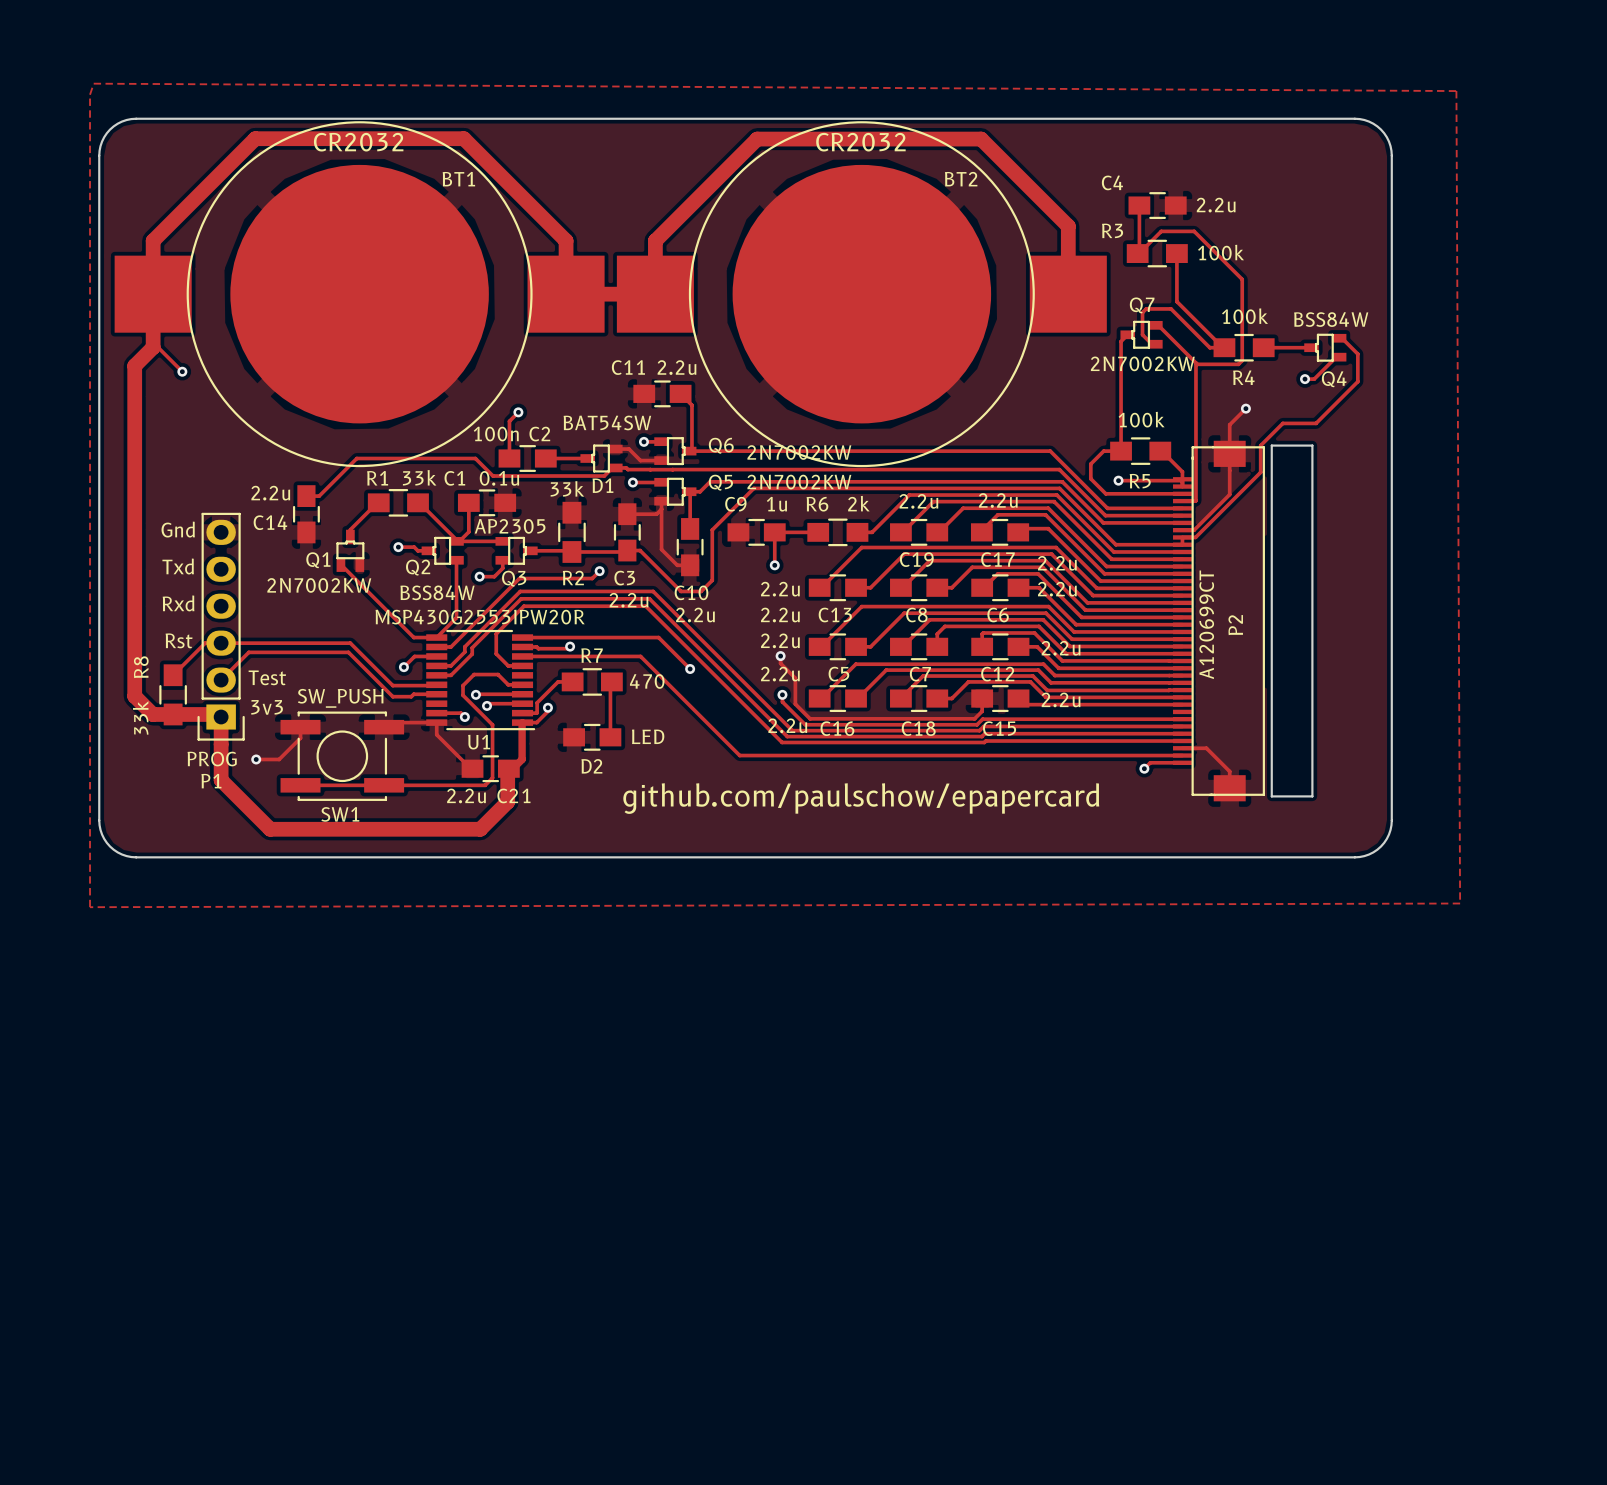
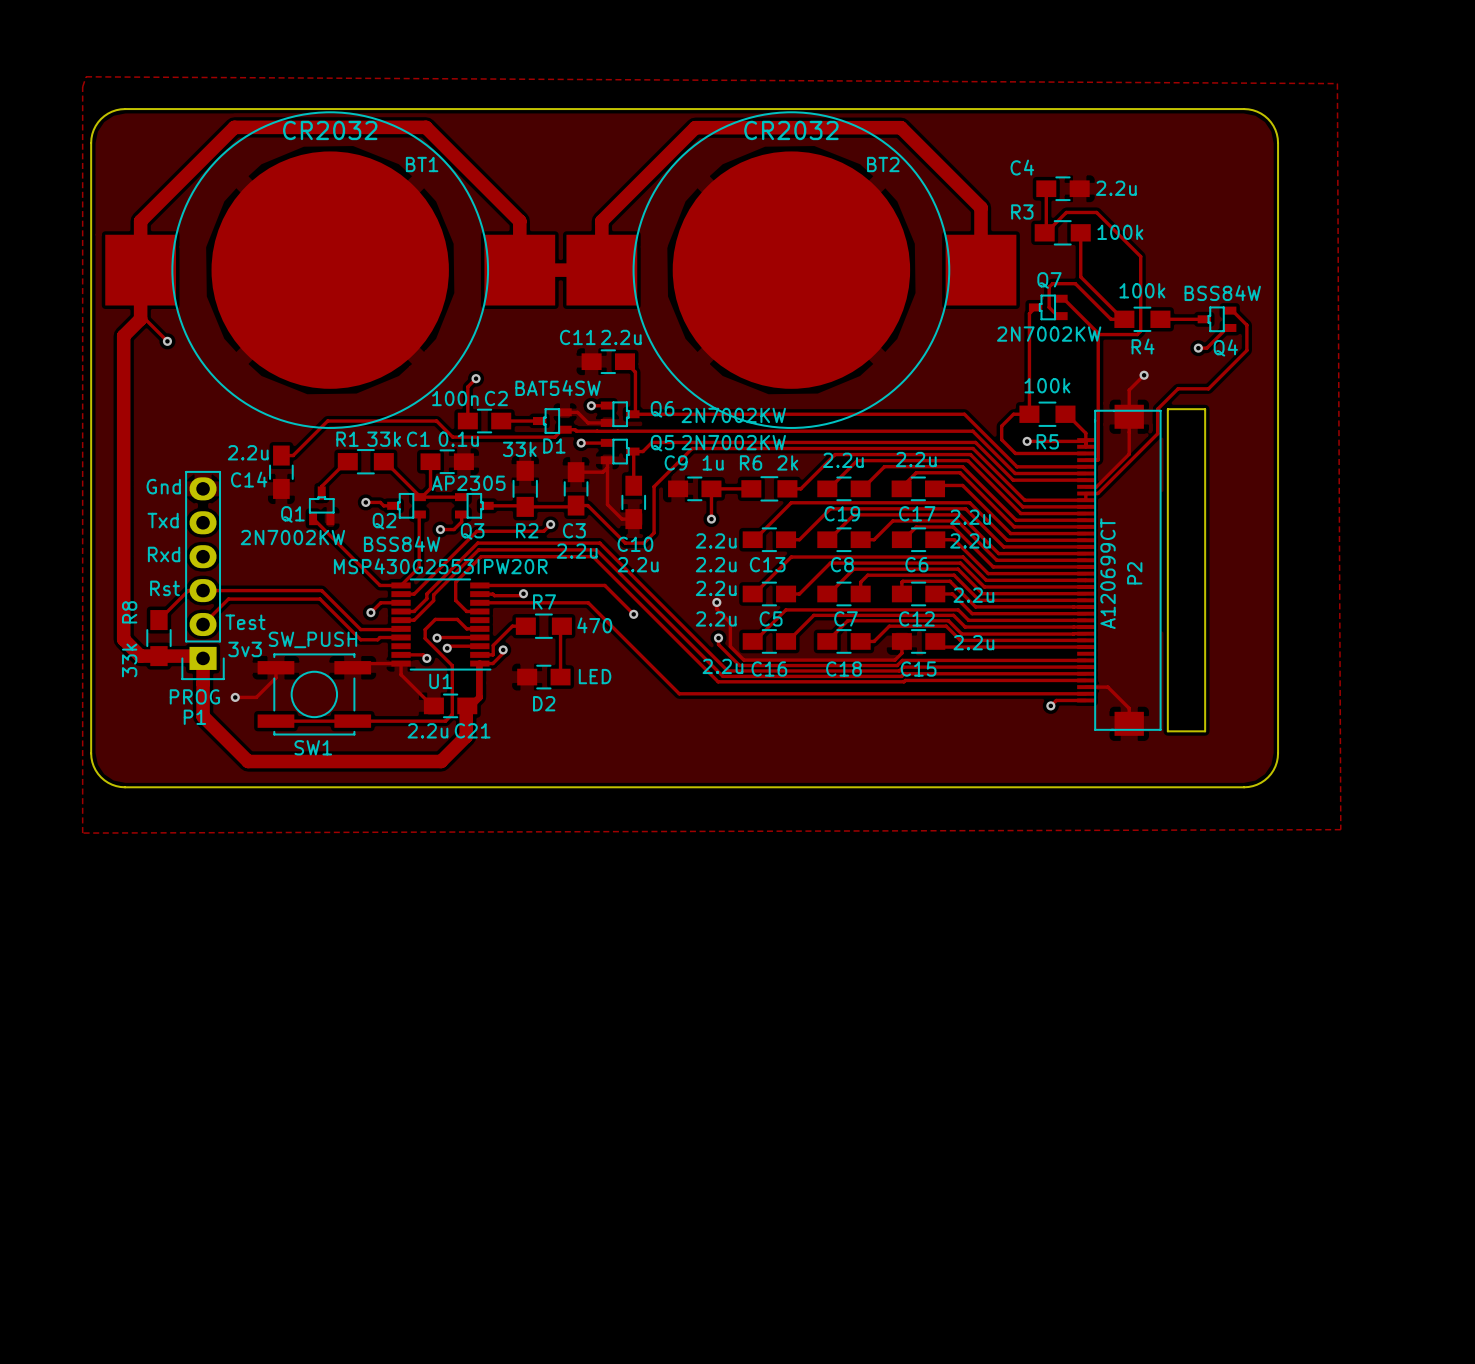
text: github.com/paulschow/epapercard (861, 798) -> none

